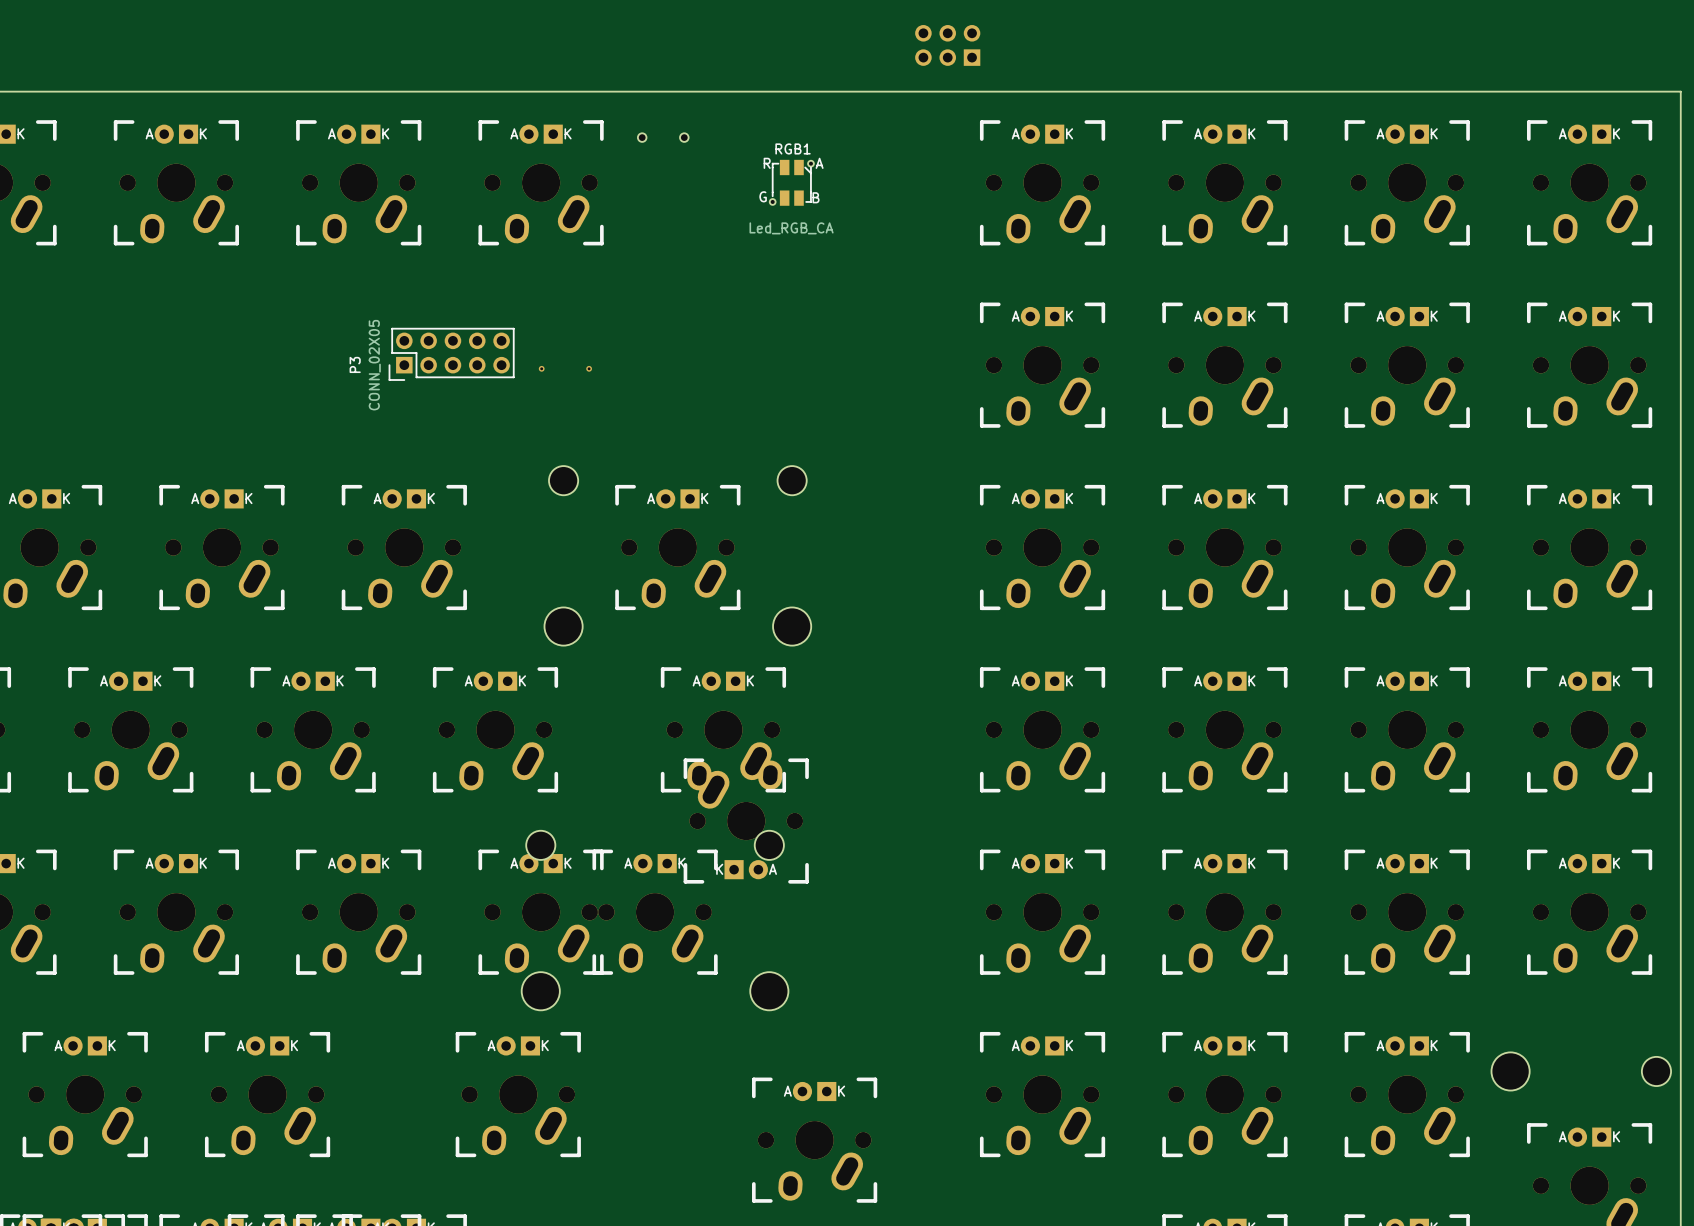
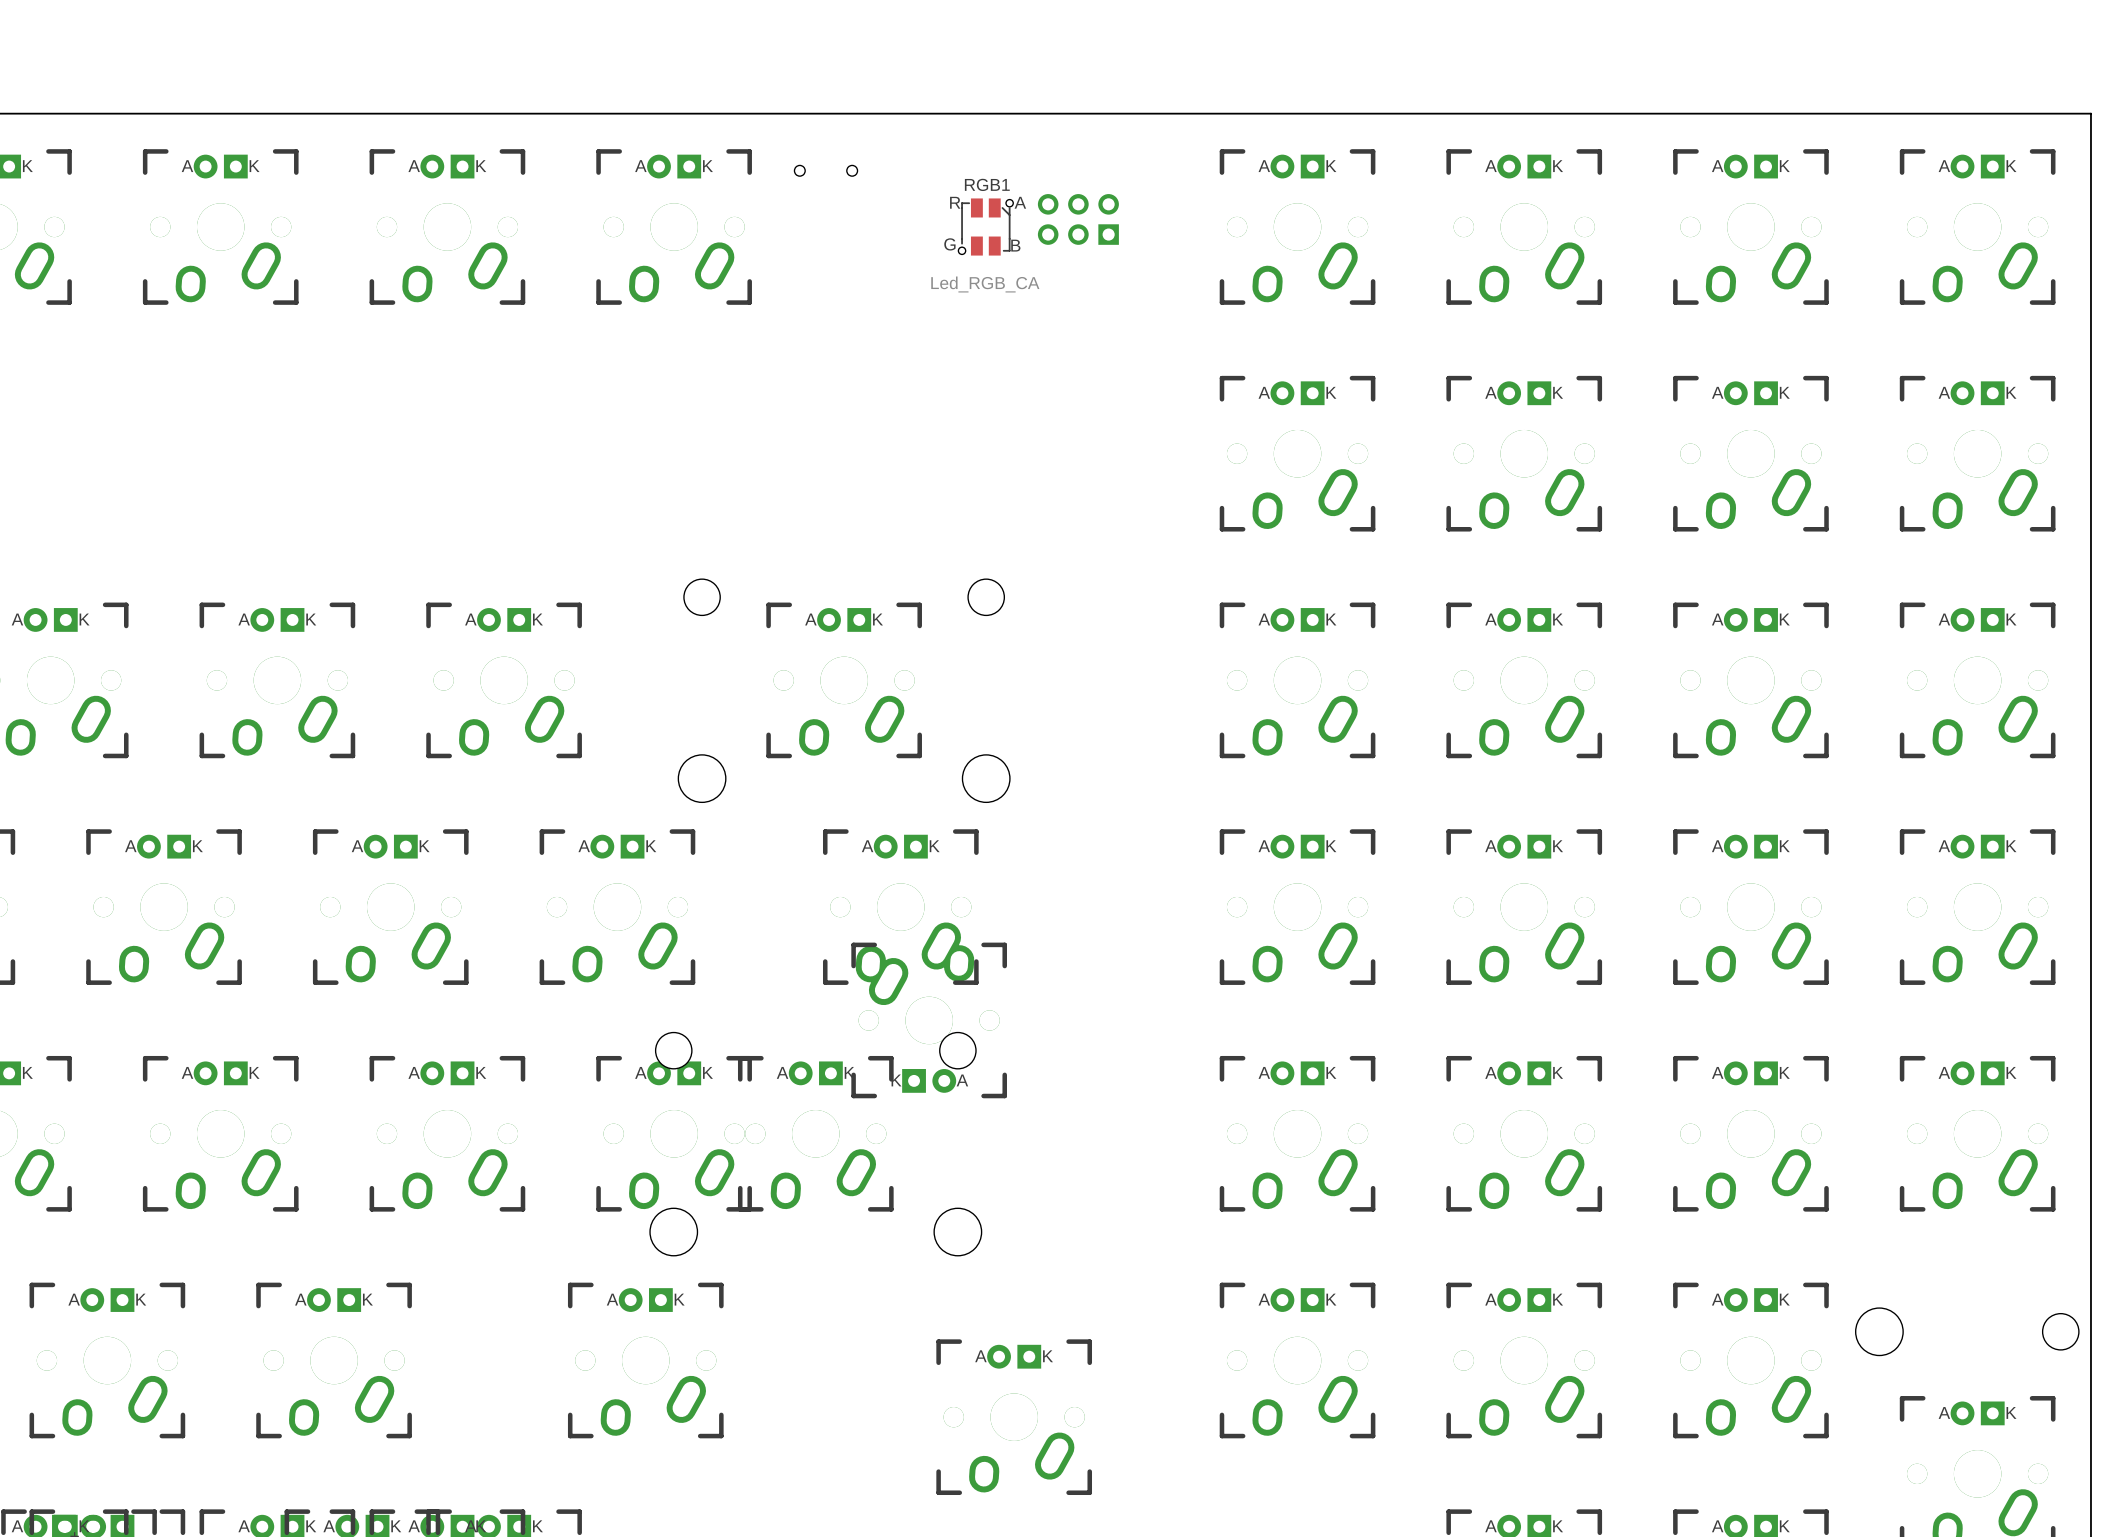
part position: (947, 45) -> (1078, 219)
P3: CONN_02X05 (451, 354) -> none
part: (541, 368) -> none
part: (589, 368) -> none

